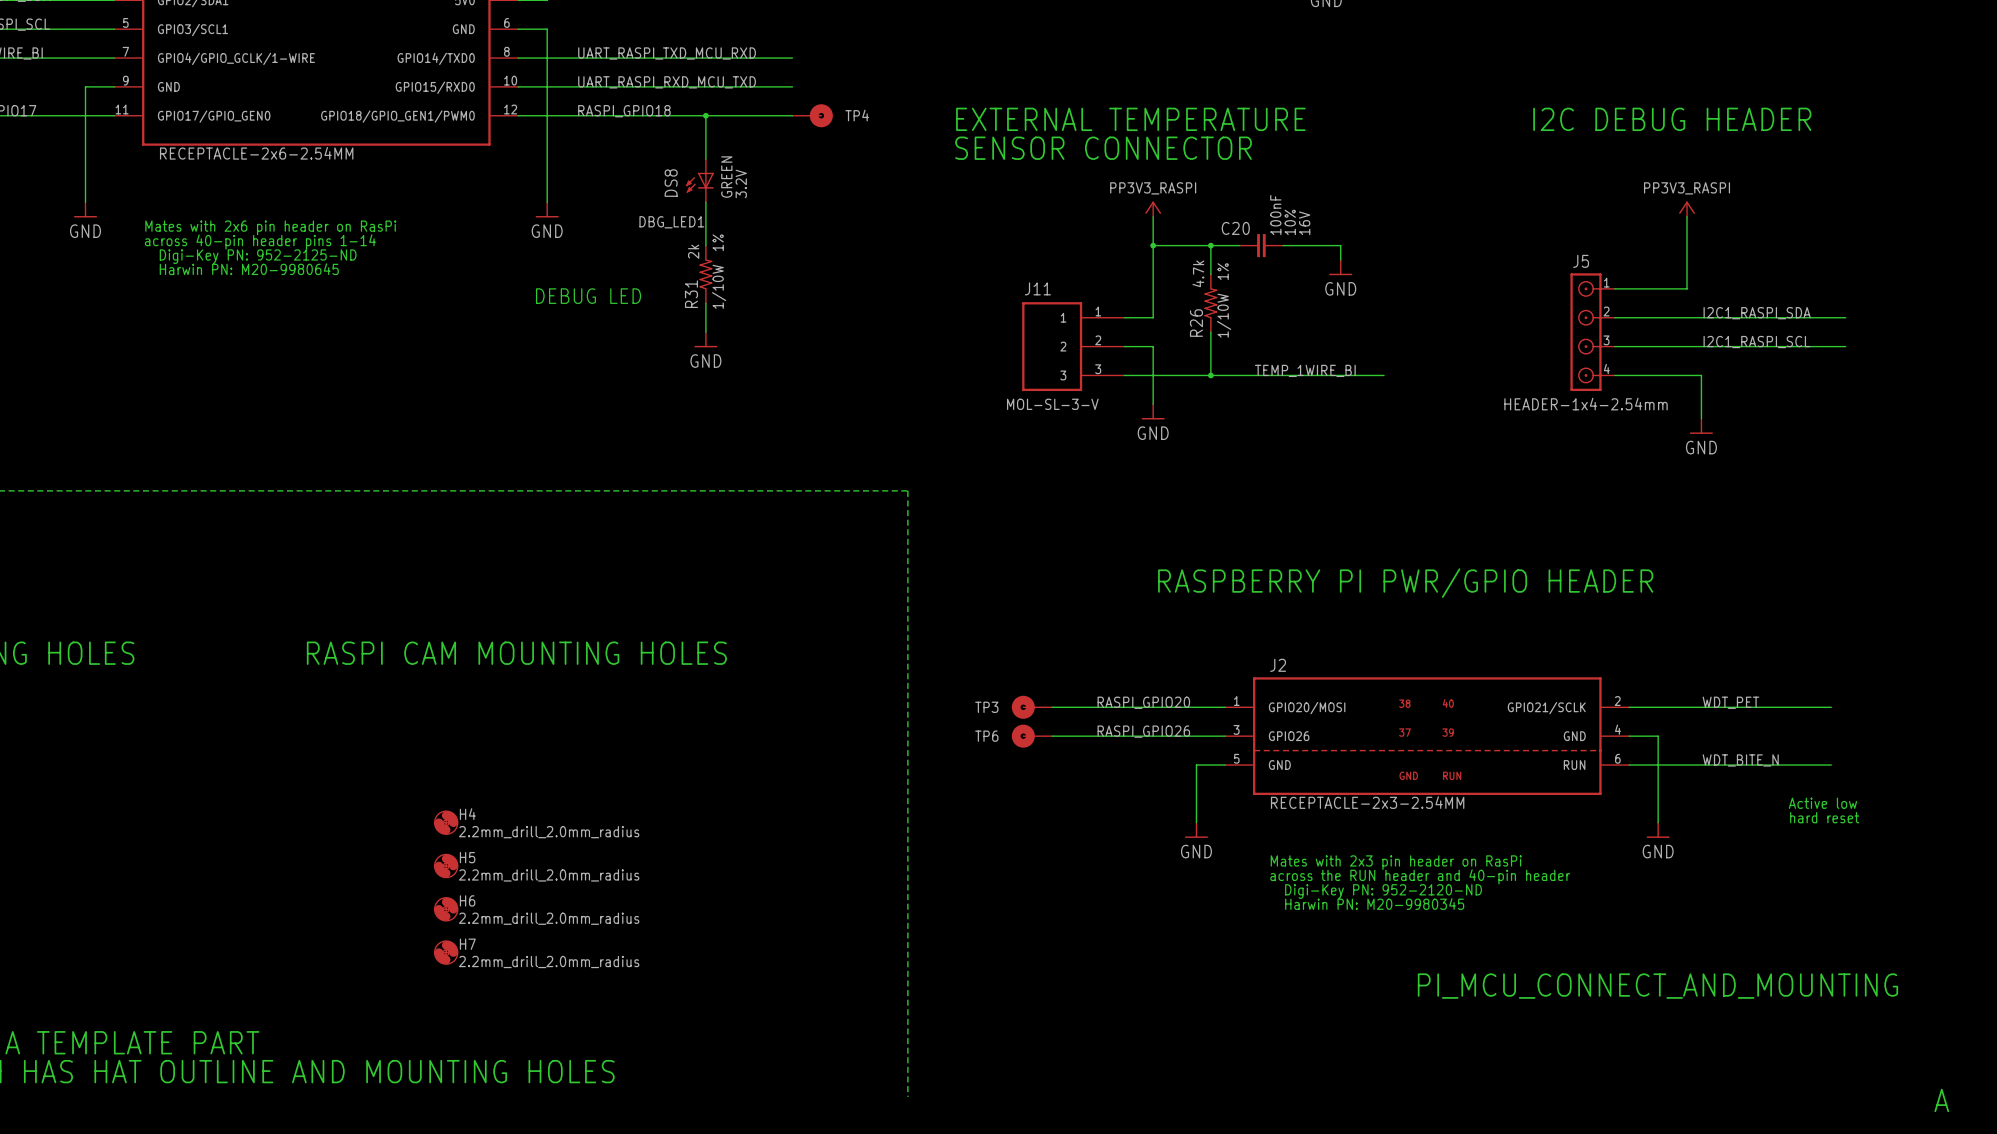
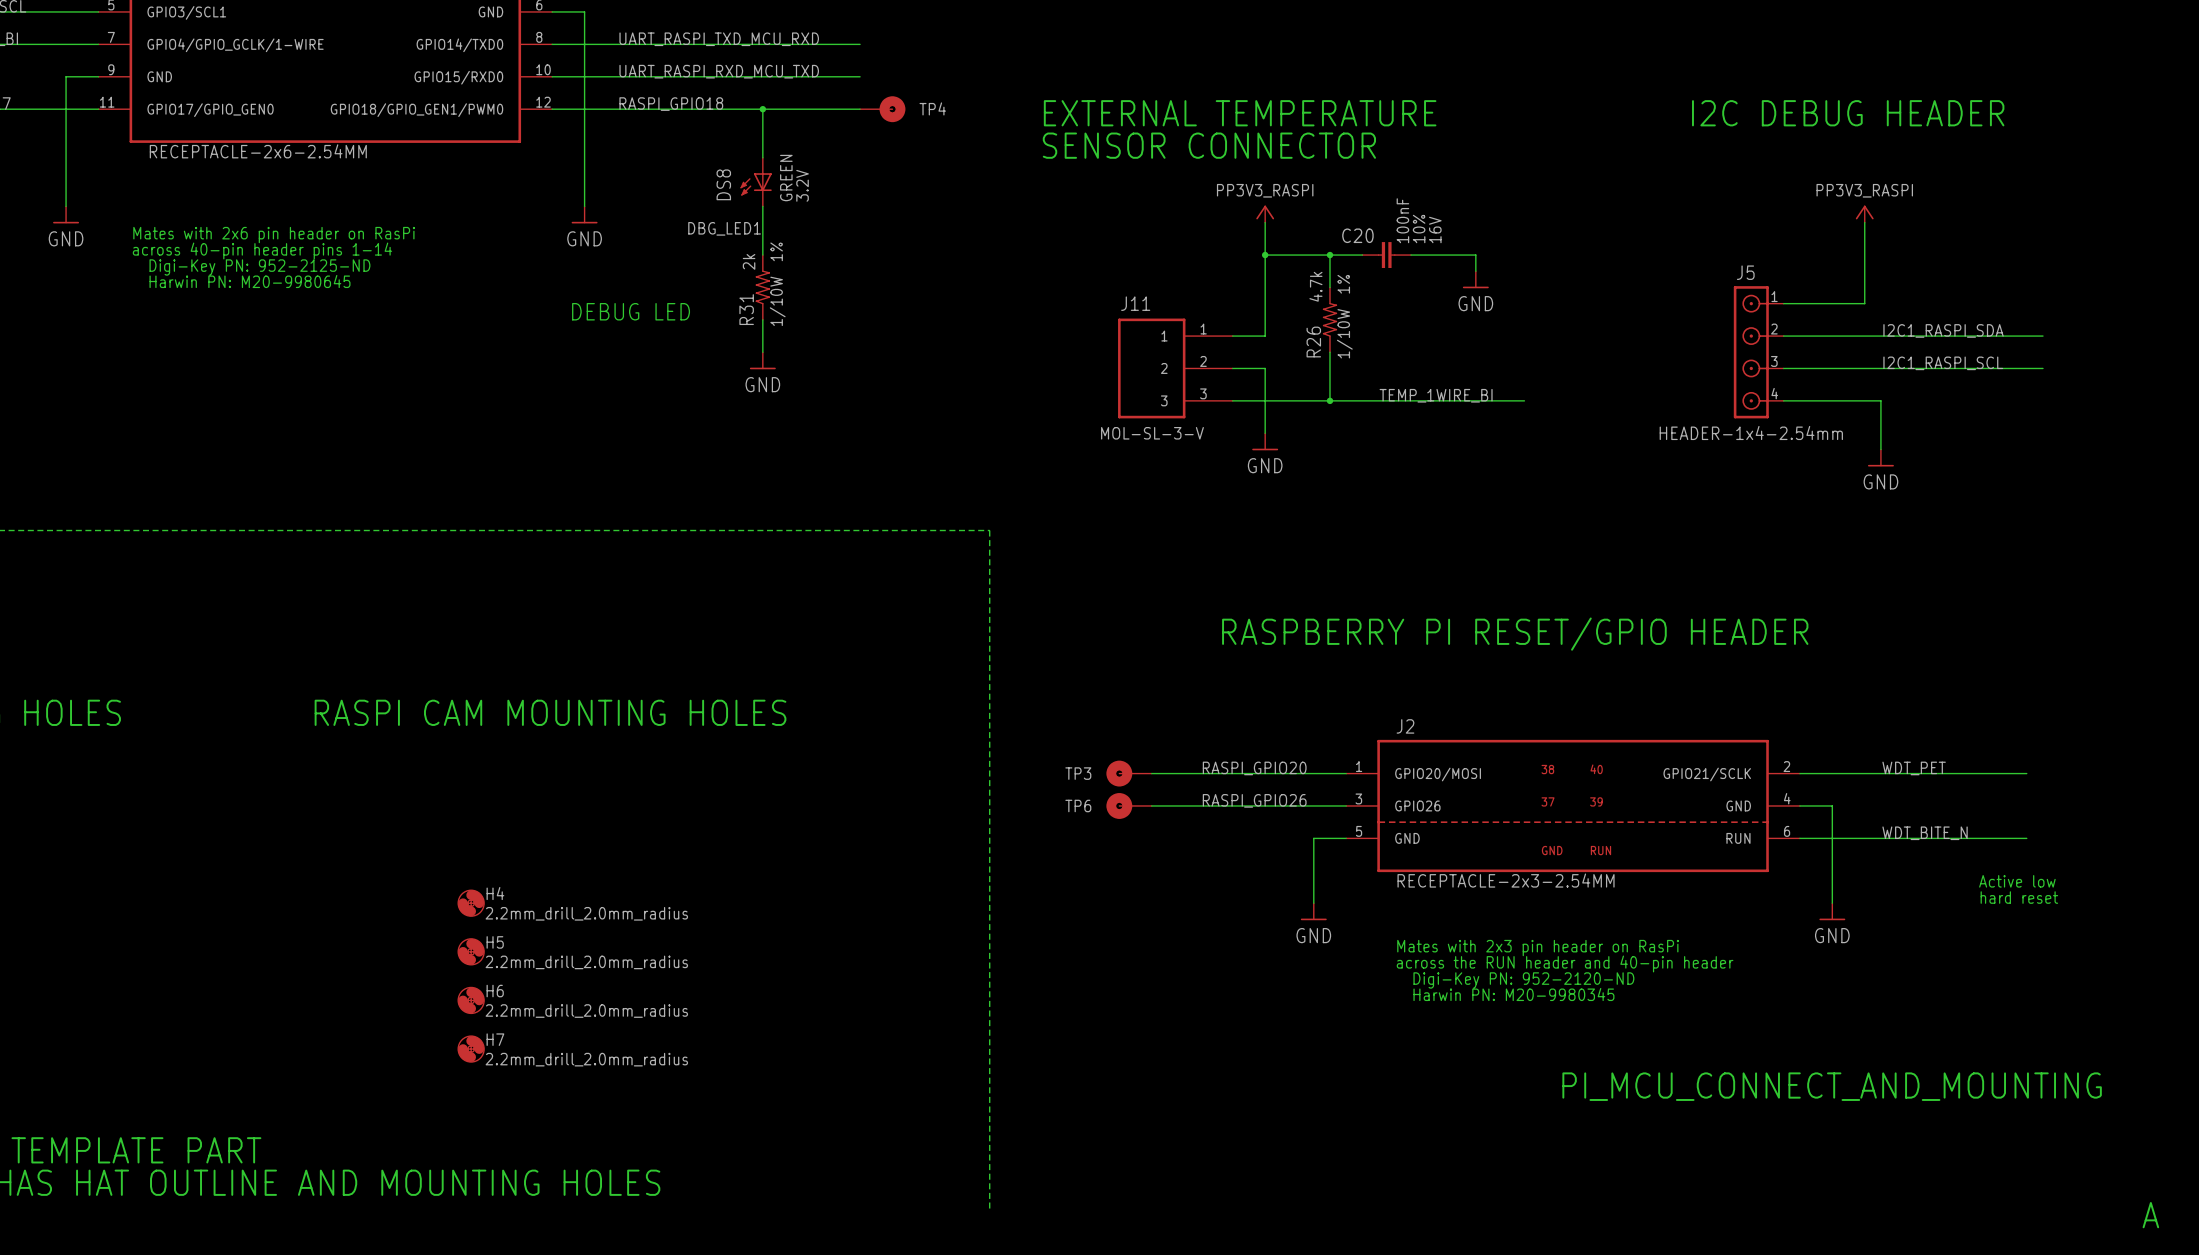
text: RASPBERRY PI PWR/GPIO HEADER (1405, 583) -> RASPBERRY PI RESET/GPIO HEADER (1515, 634)

